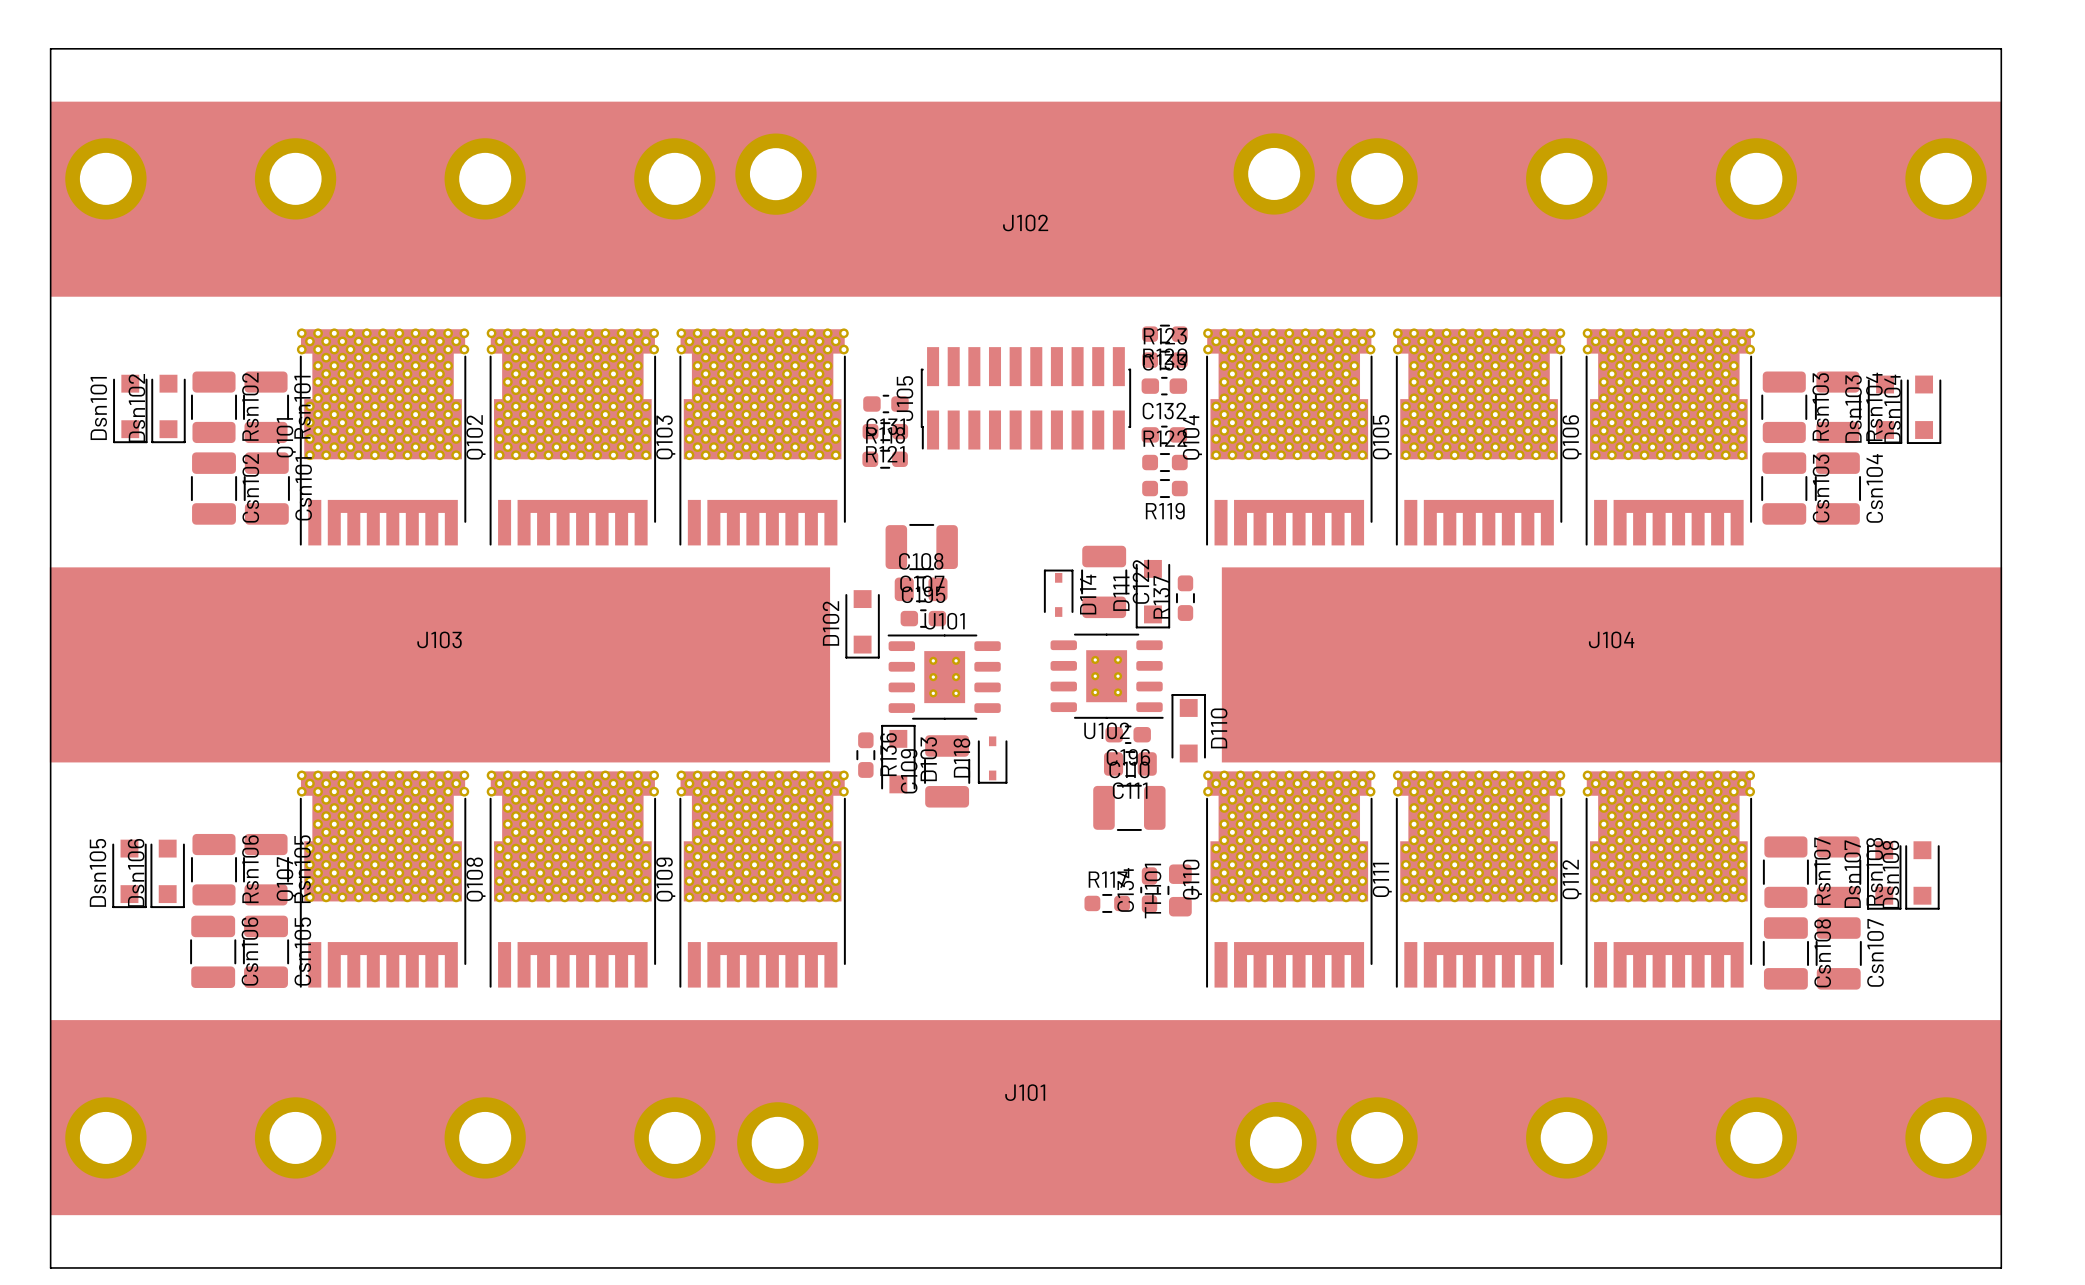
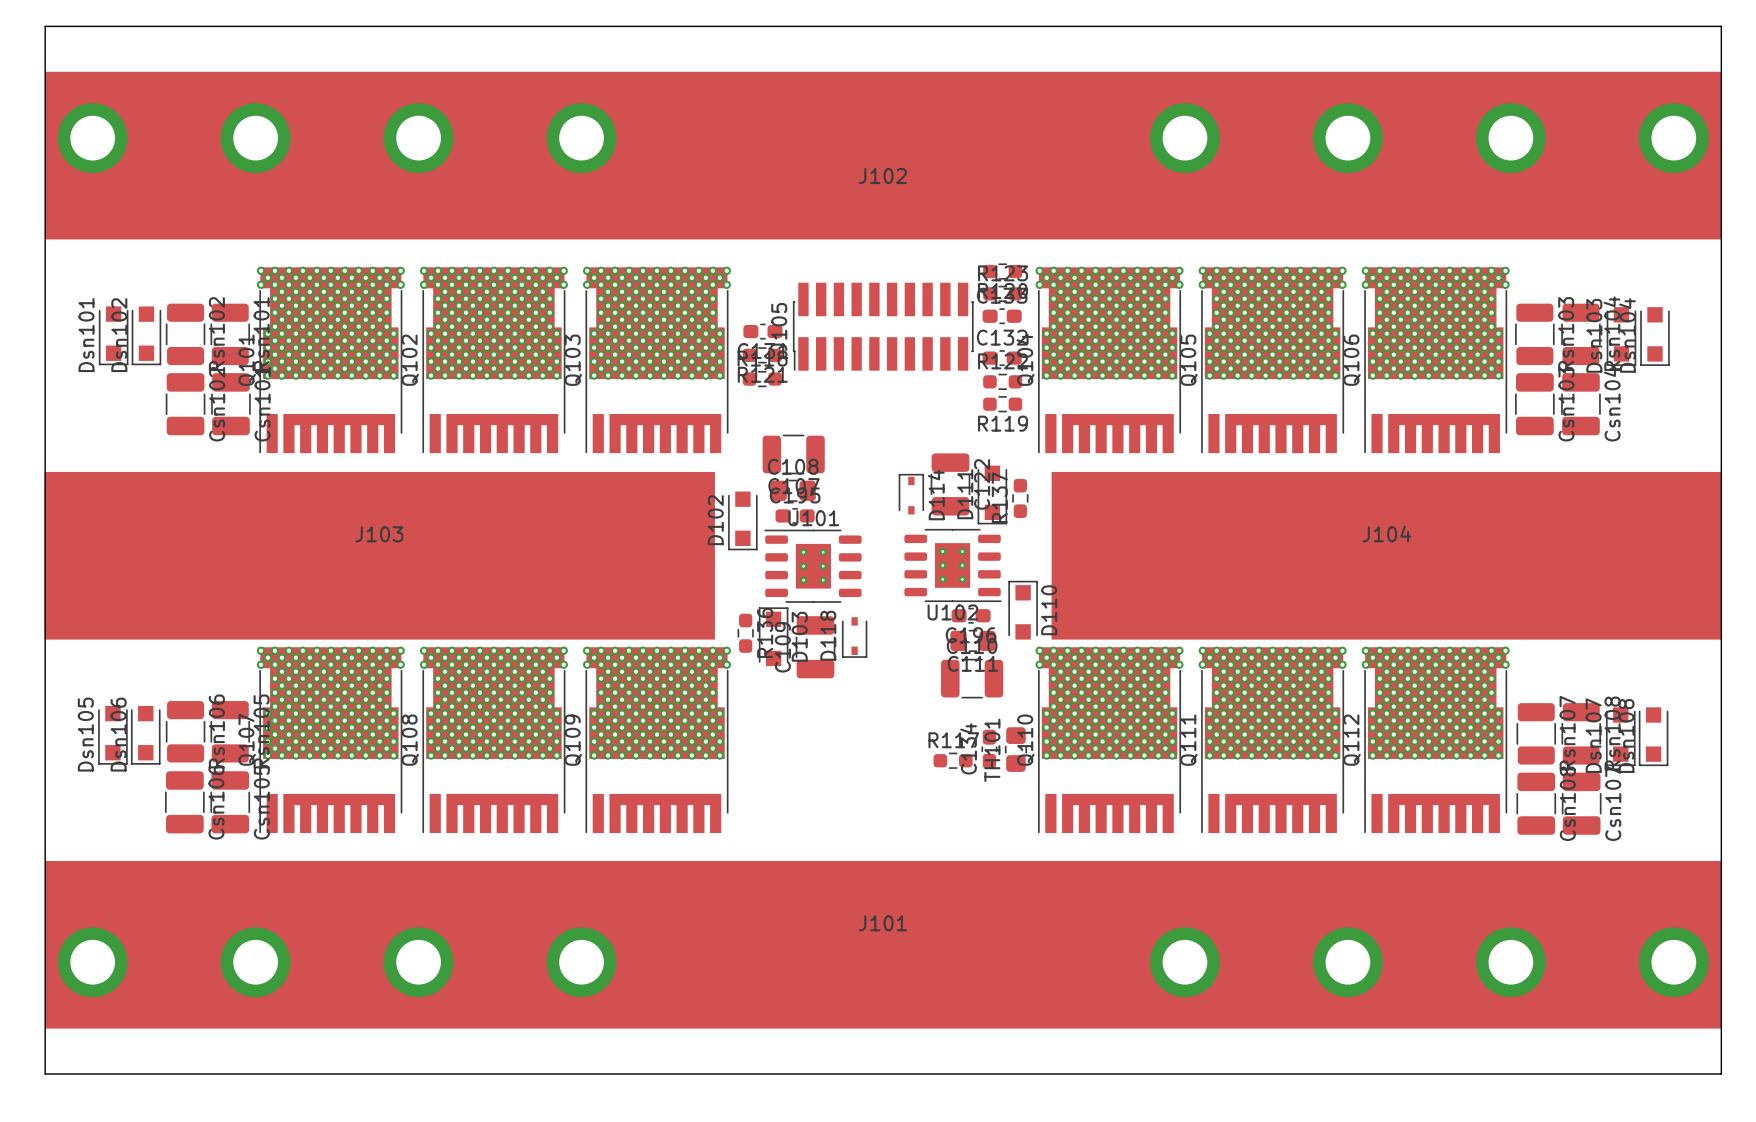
J102 footprint: [50, 101, 2002, 297] -> [45, 71, 1722, 240]
J101 footprint: [50, 1020, 2002, 1216] -> [45, 860, 1722, 1029]

